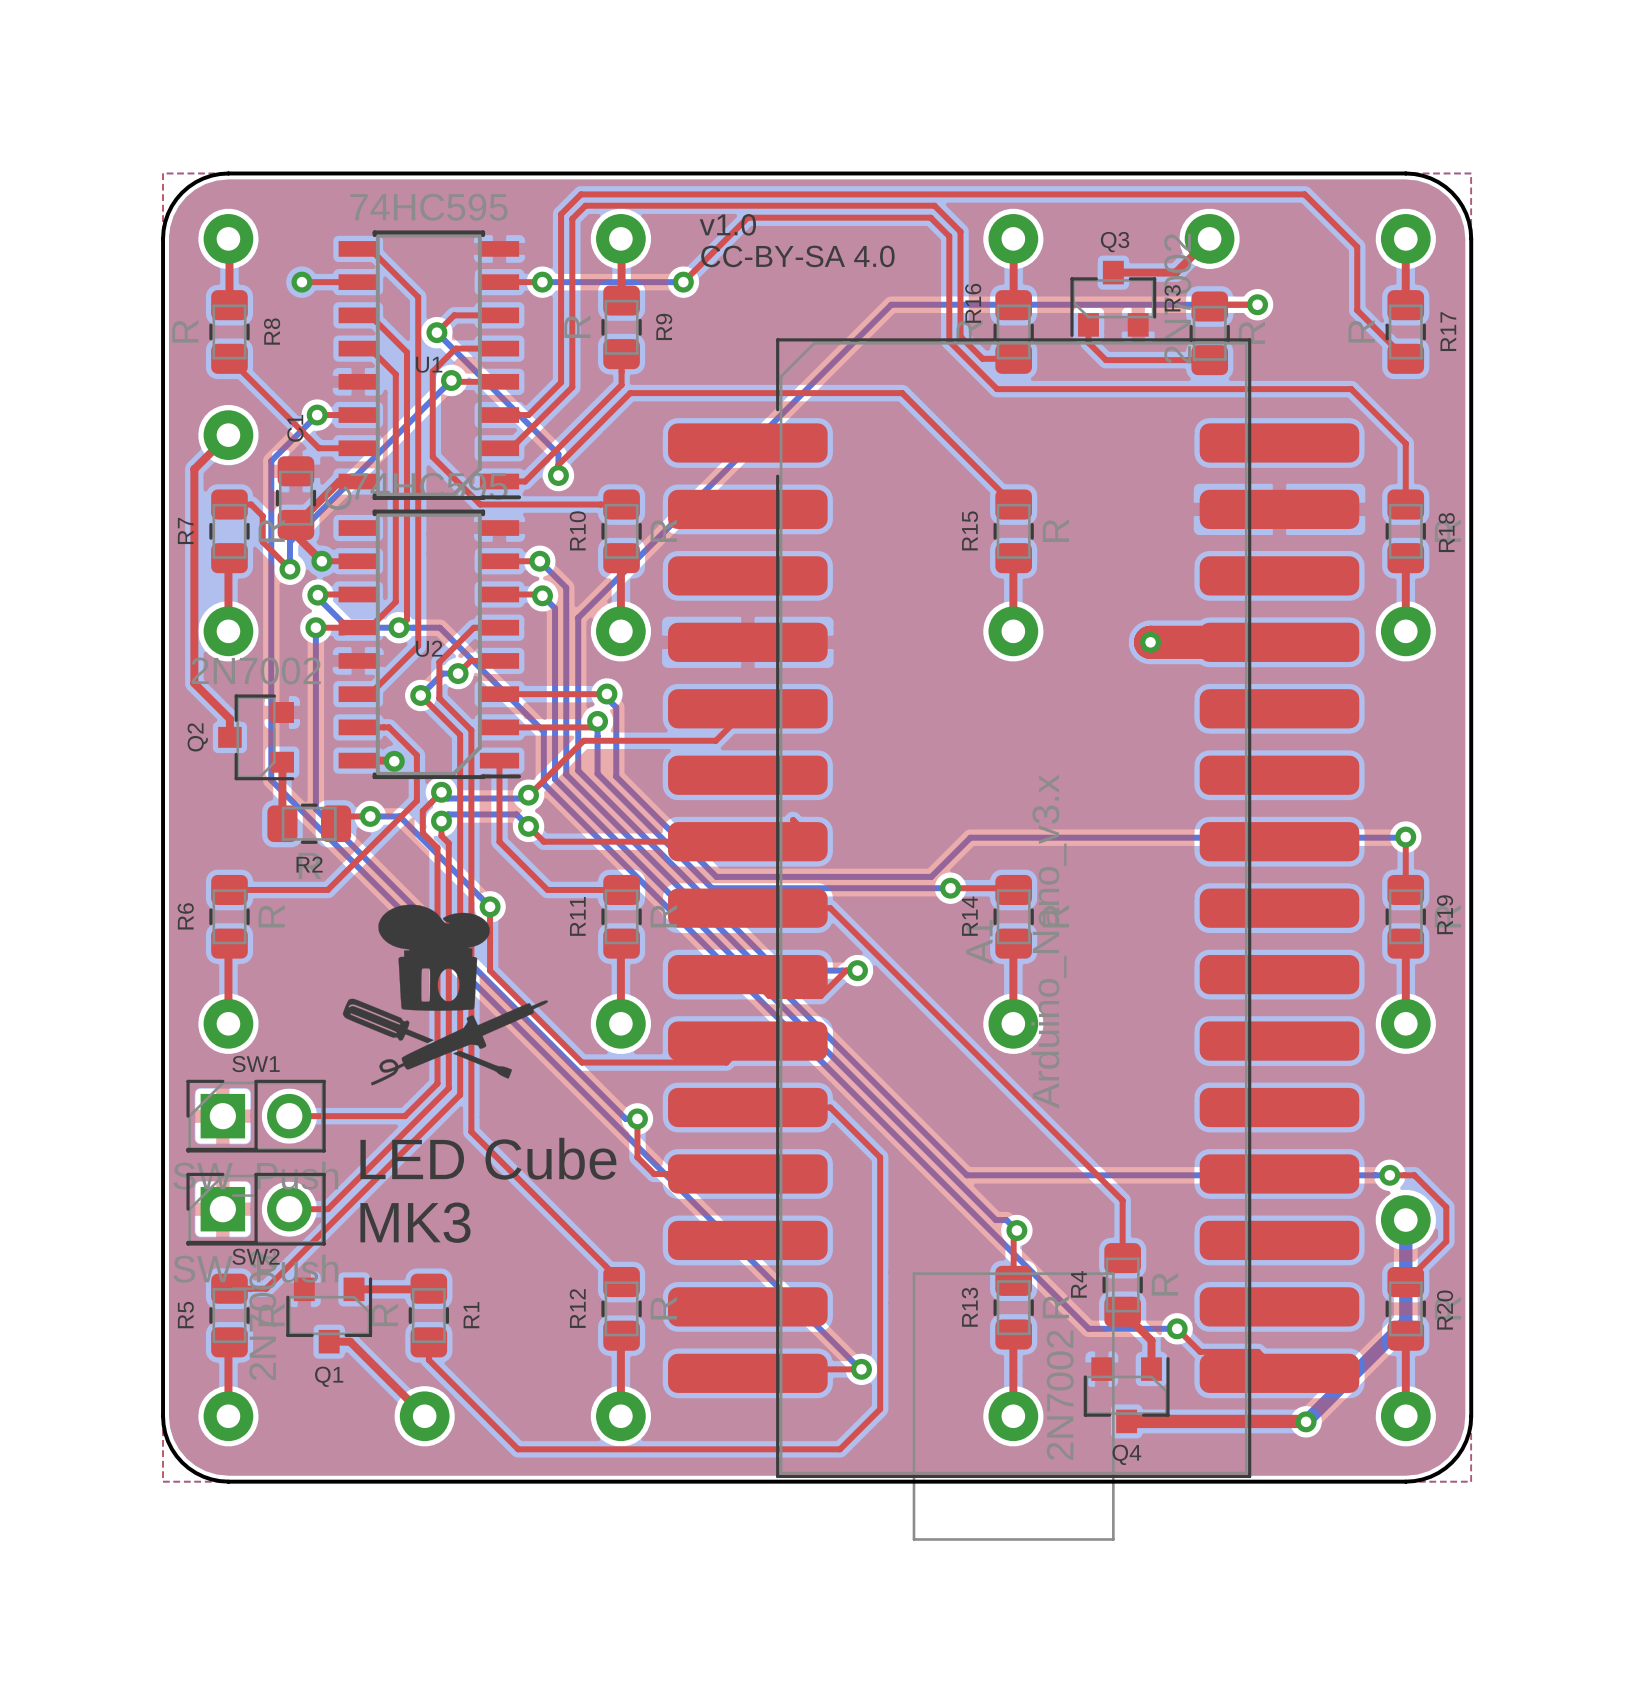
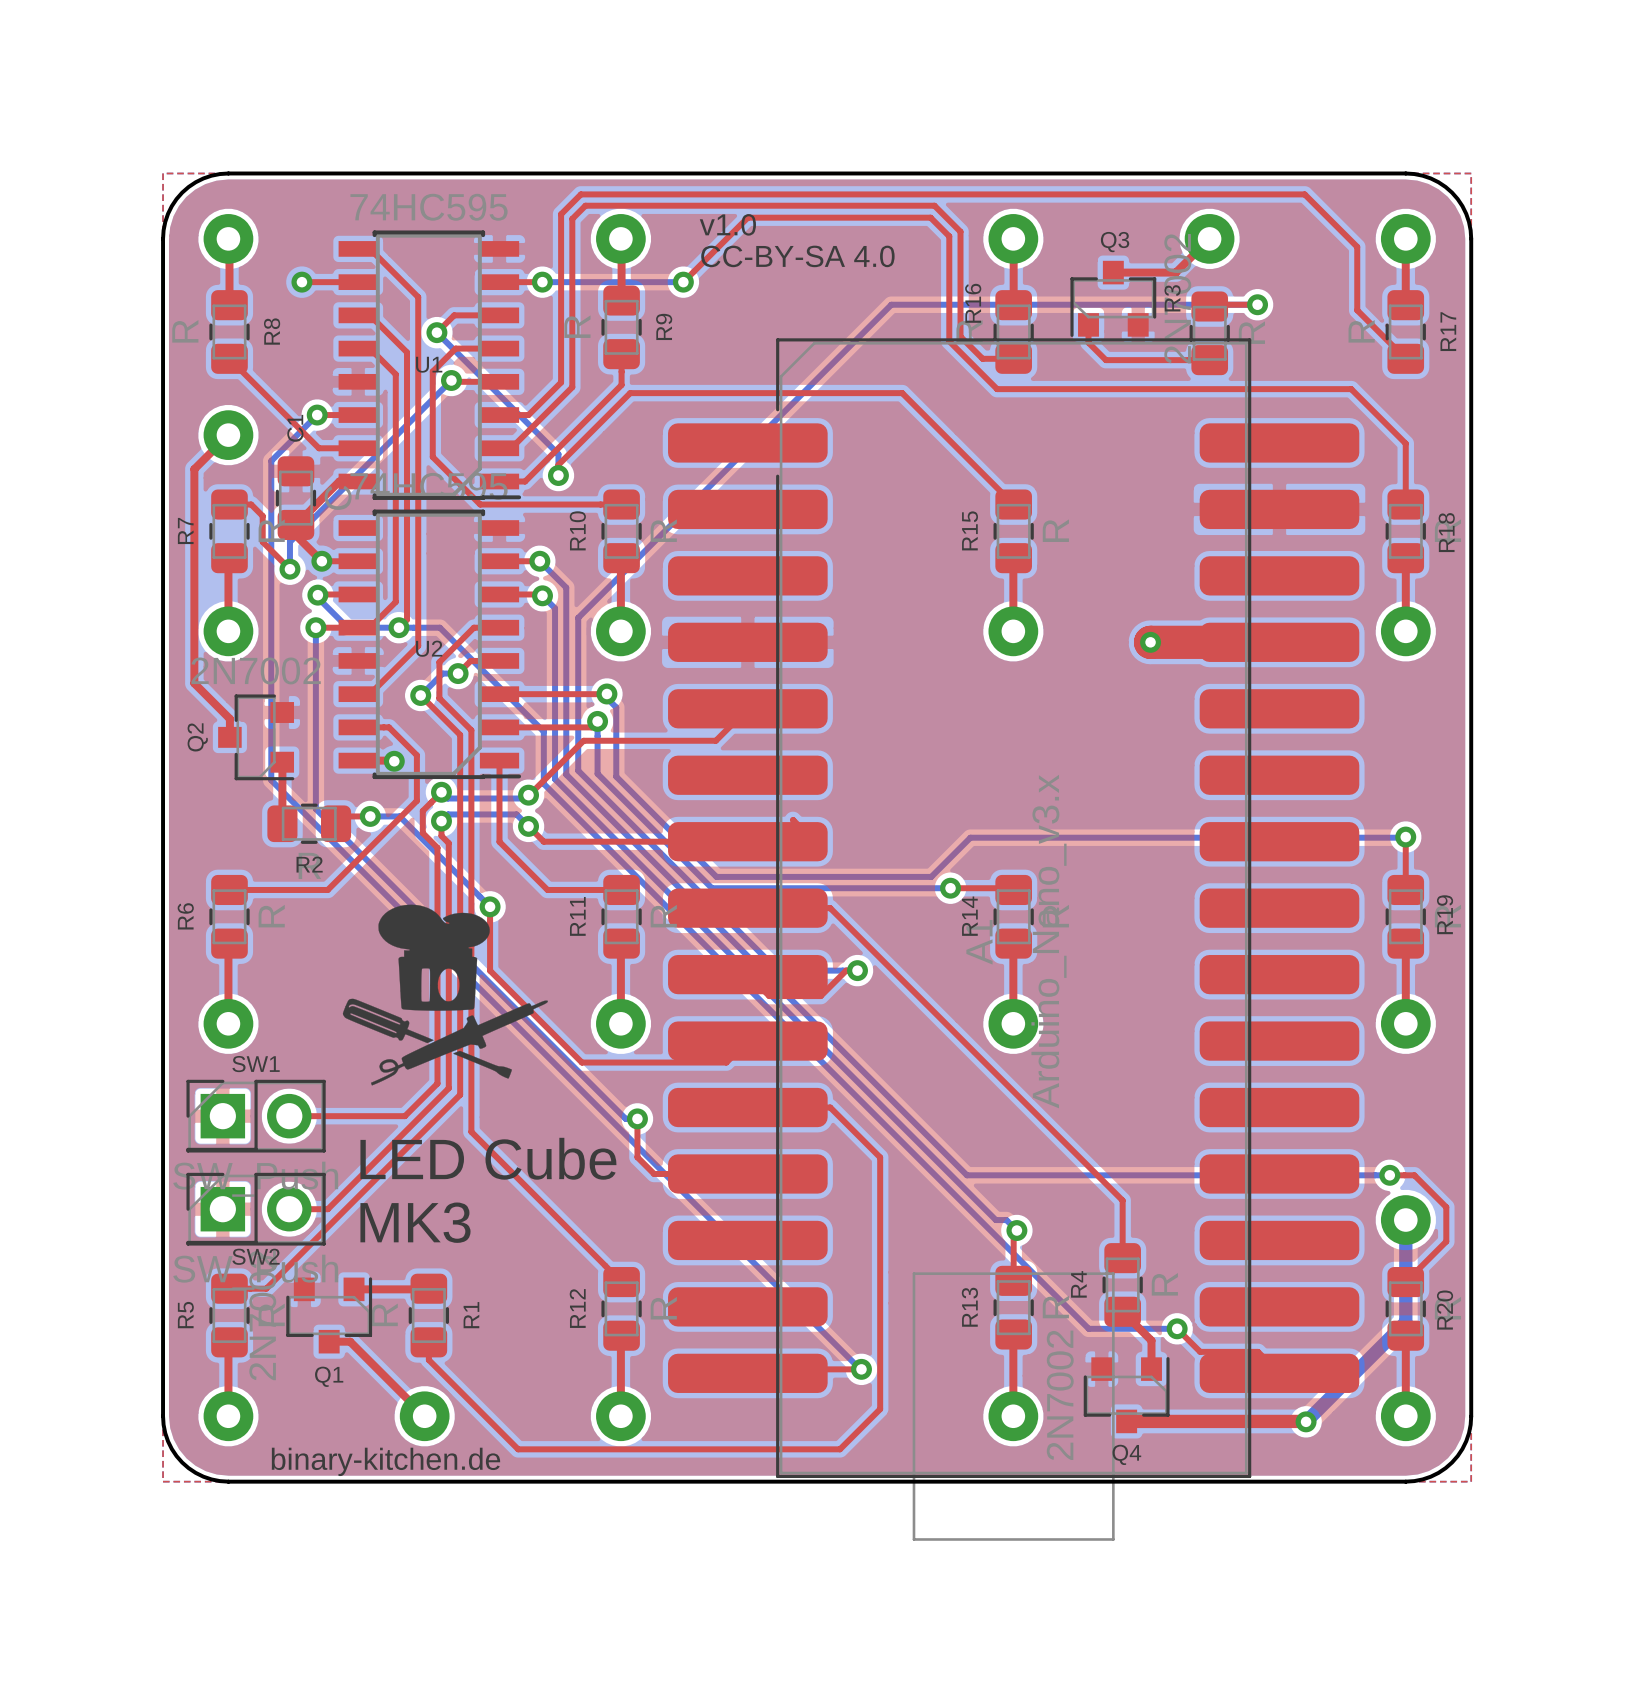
text: none -> binary-kitchen.de (385, 1461)

